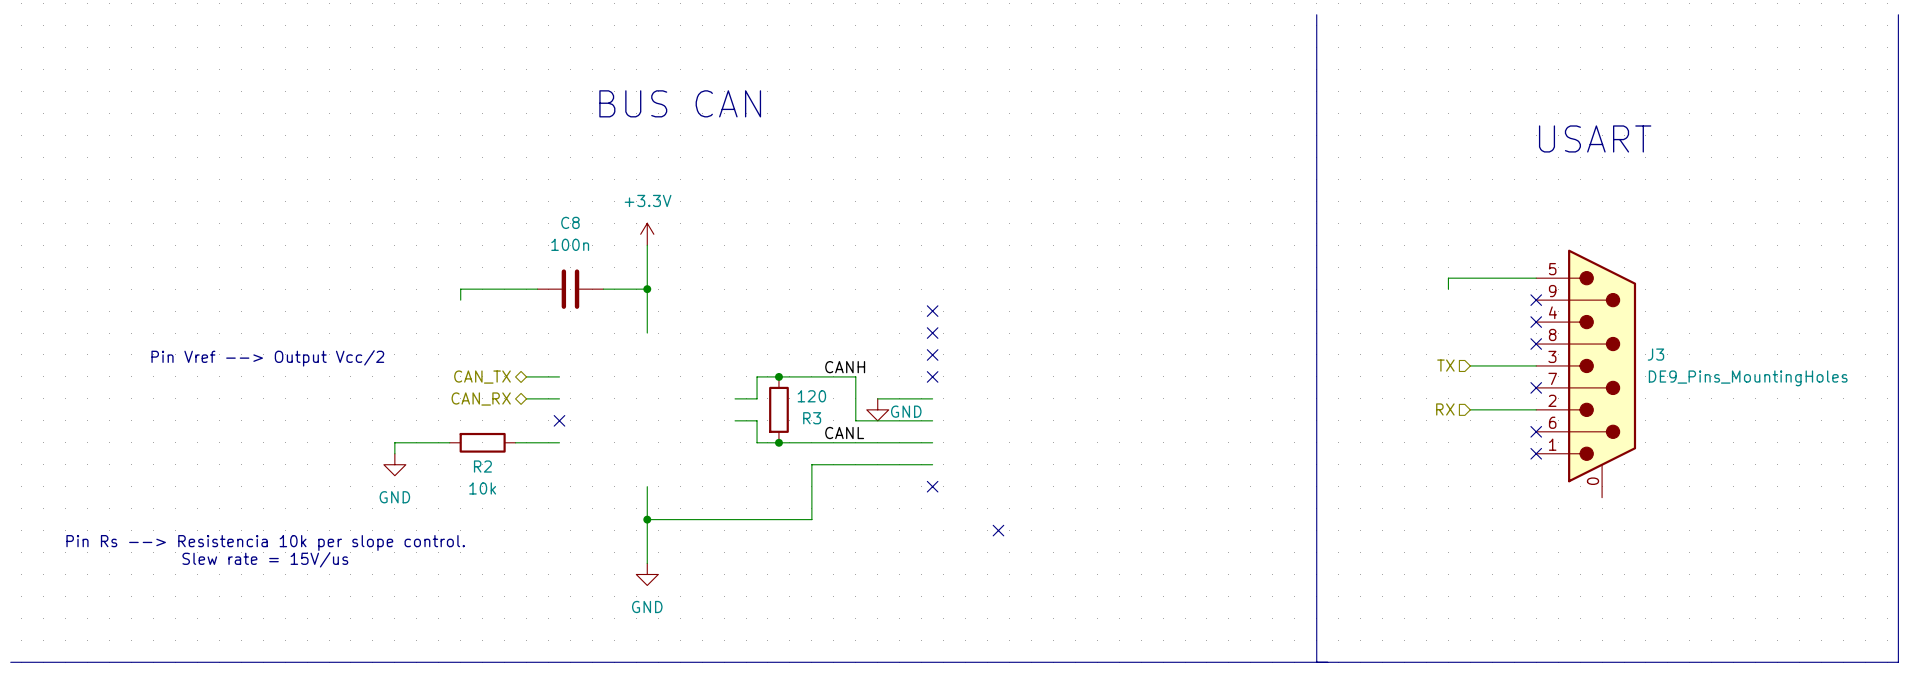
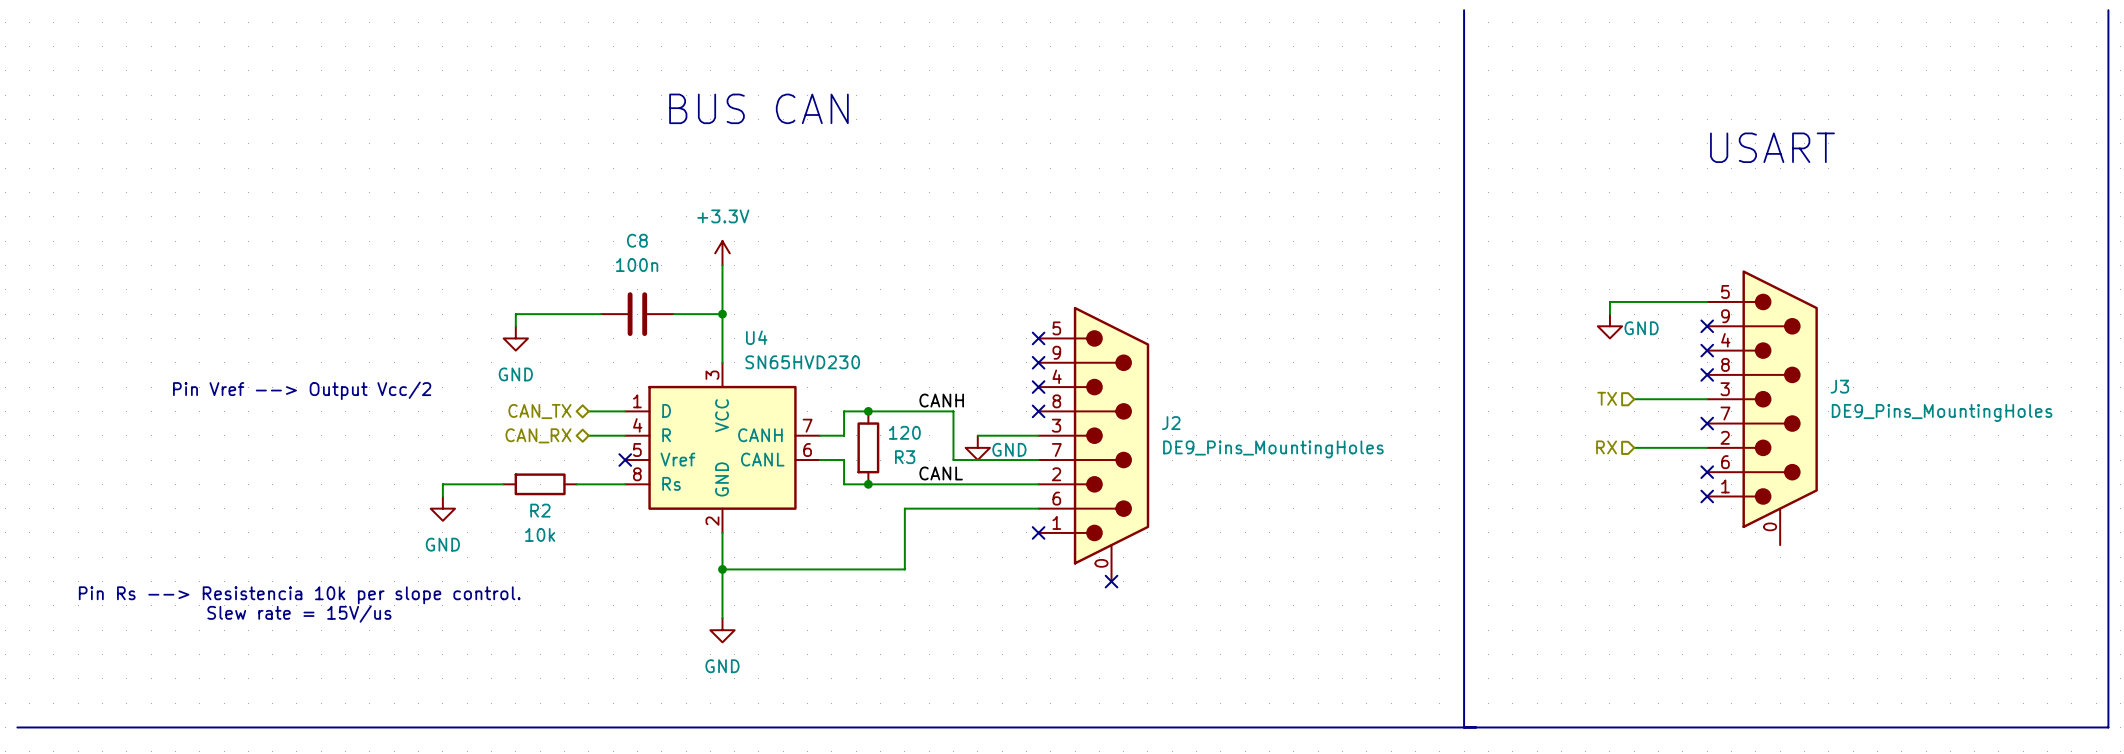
power symbol: none -> GND (1609, 326)
power symbol: none -> GND (515, 338)
J2: none -> DE9_Pins_MountingHoles (1093, 444)
U4: none -> SN65HVD230 (722, 447)

